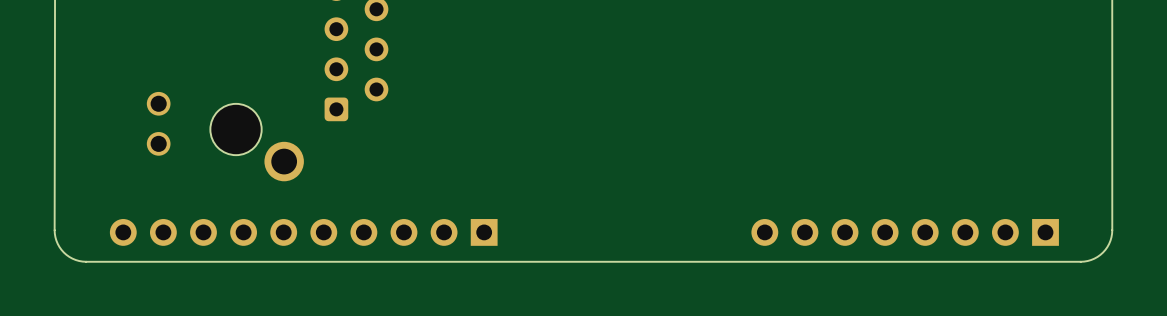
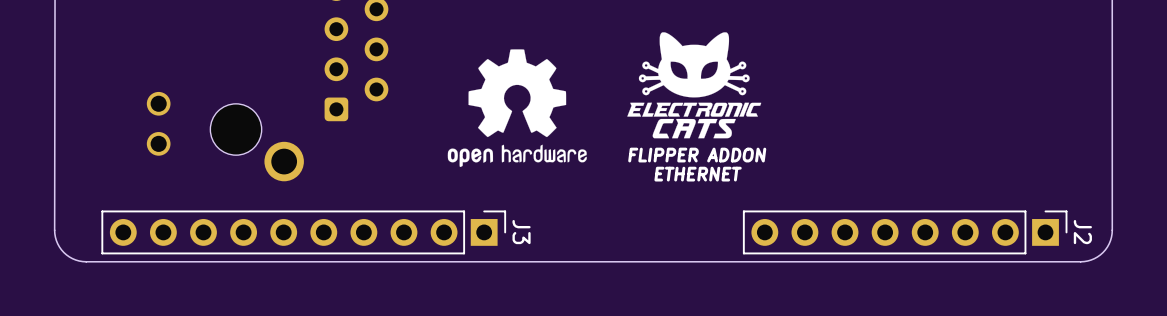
drawing: none -> [627, 32, 762, 139]
drawing: none -> [447, 49, 587, 168]
text: none -> FLIPPER ADDON (697, 155)
text: none -> ETHERNET (698, 174)
J3 side: top (303, 232) -> bottom (303, 232)
J2 side: top (905, 232) -> bottom (905, 232)

